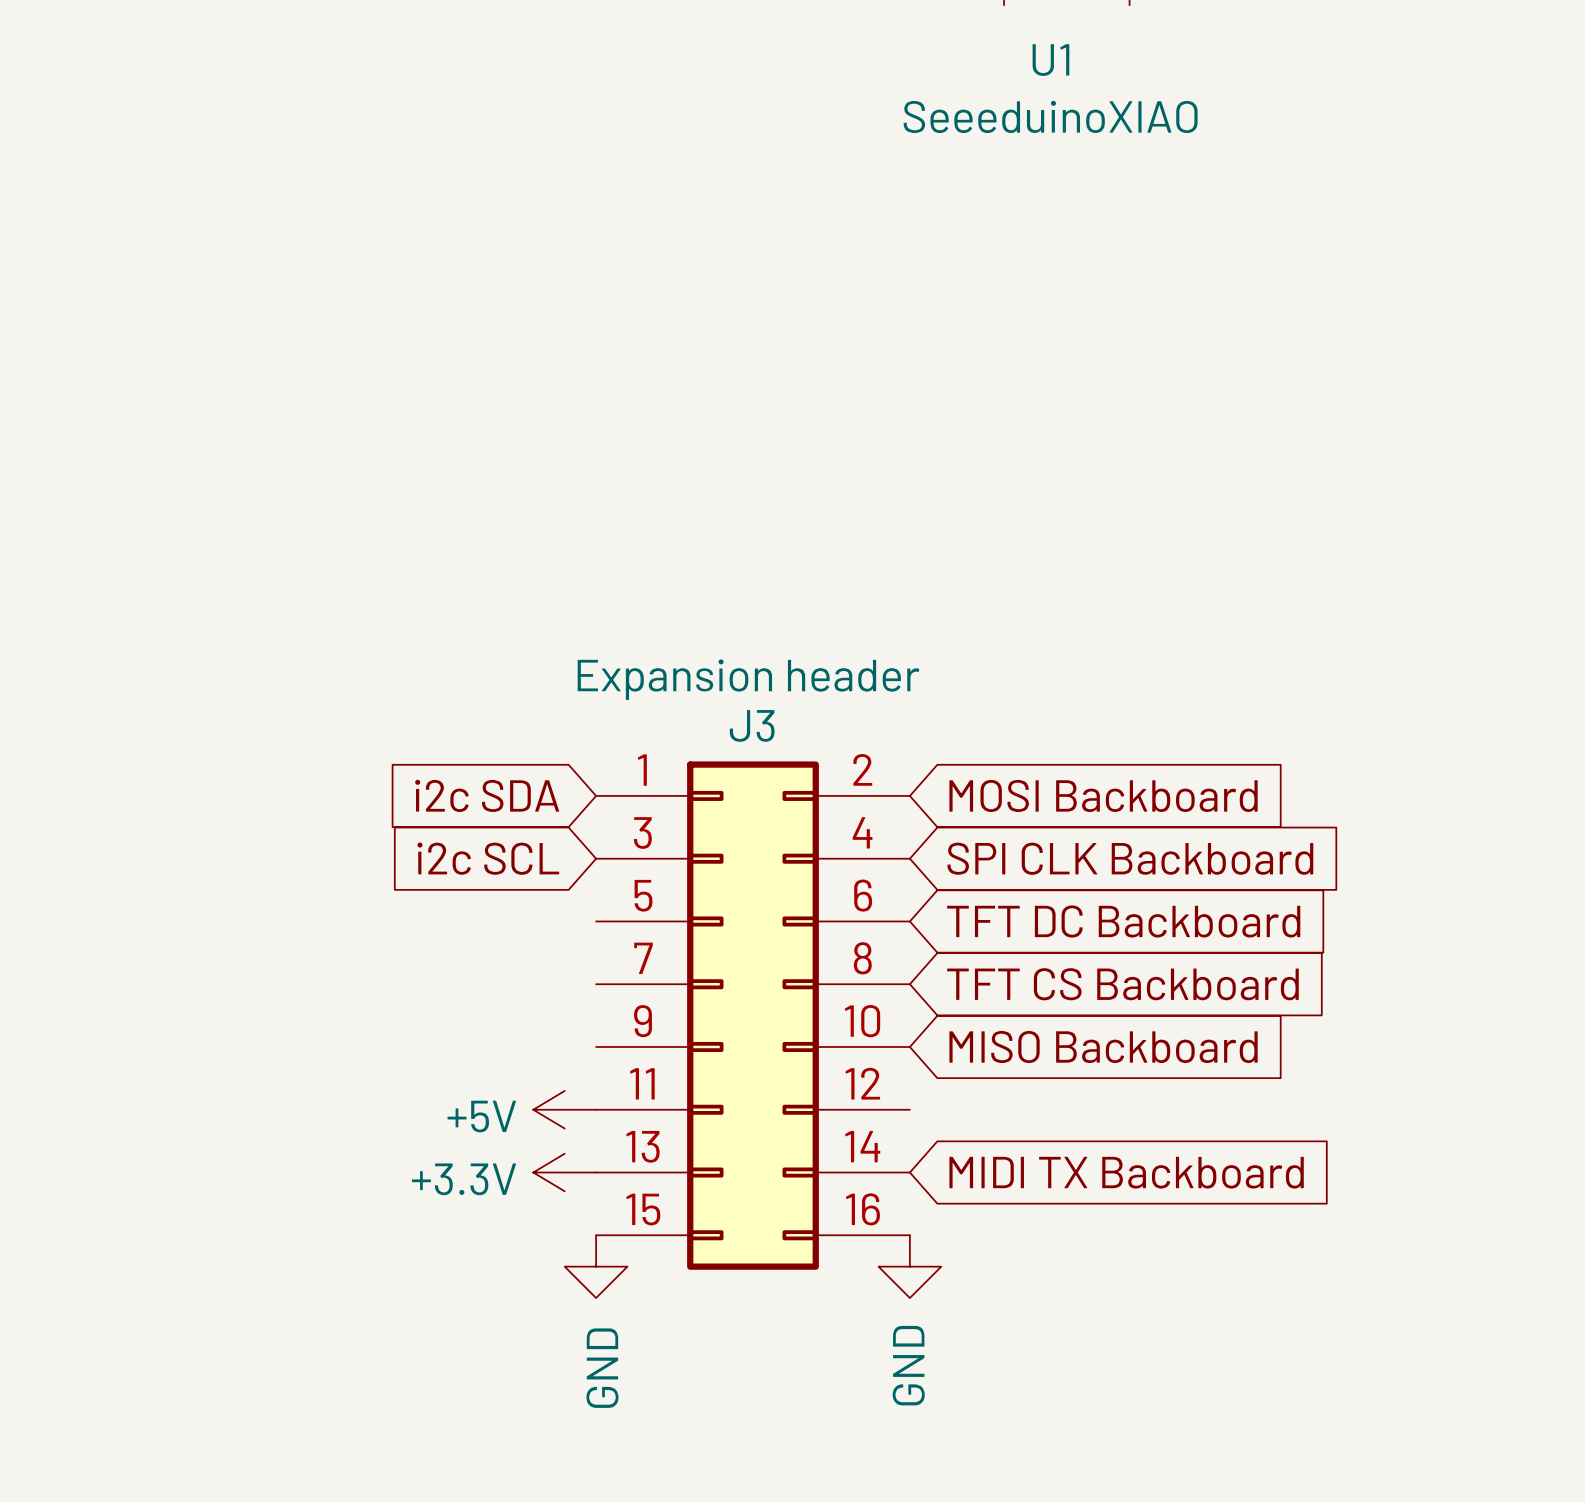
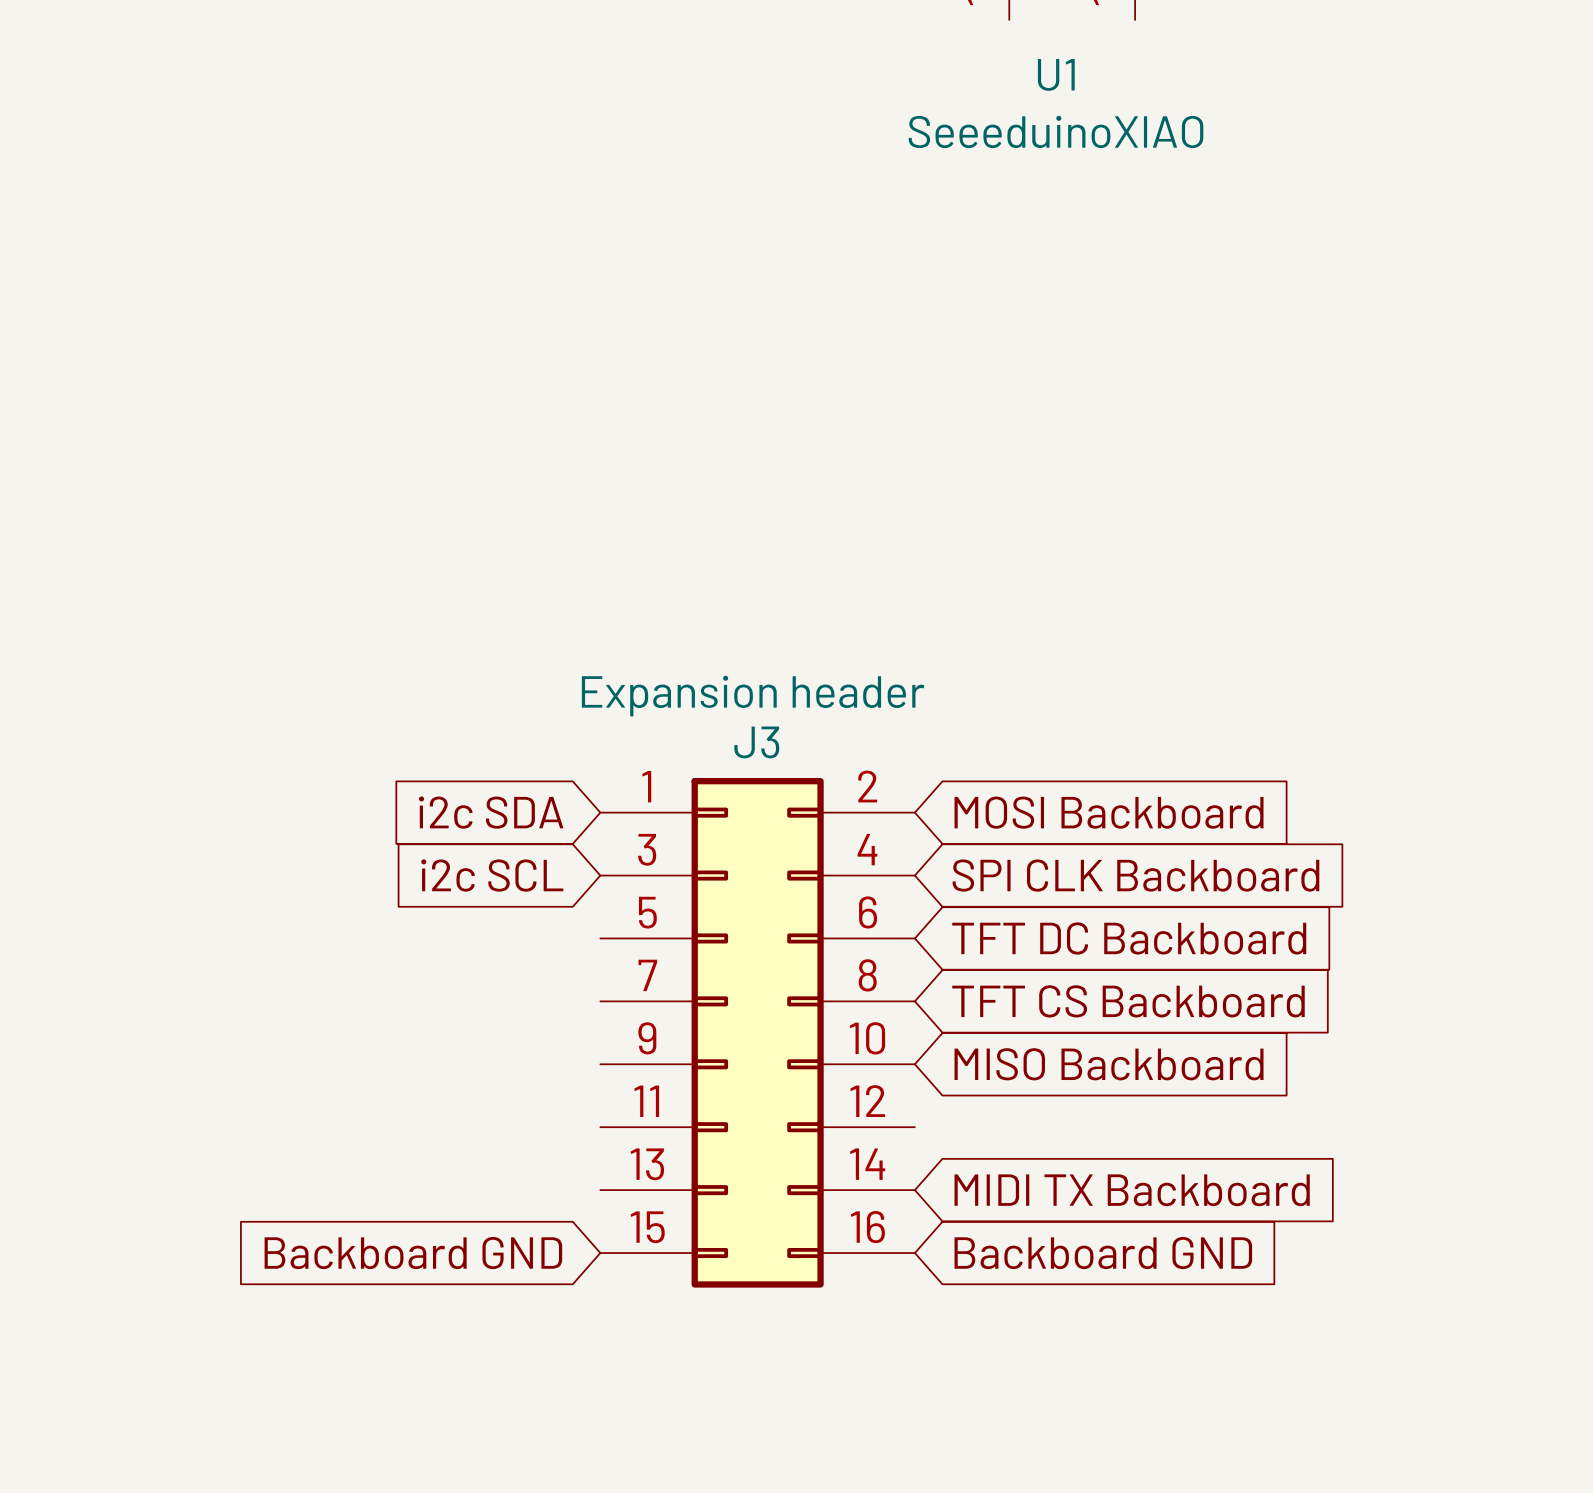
power symbol: +5V (564, 1109) -> none
power symbol: +3.3V (564, 1172) -> none
global label: none -> Backboard GND (413, 1253)
global label: none -> Backboard GND (1103, 1253)
power symbol: GND (596, 1266) -> none
power symbol: GND (909, 1266) -> none

